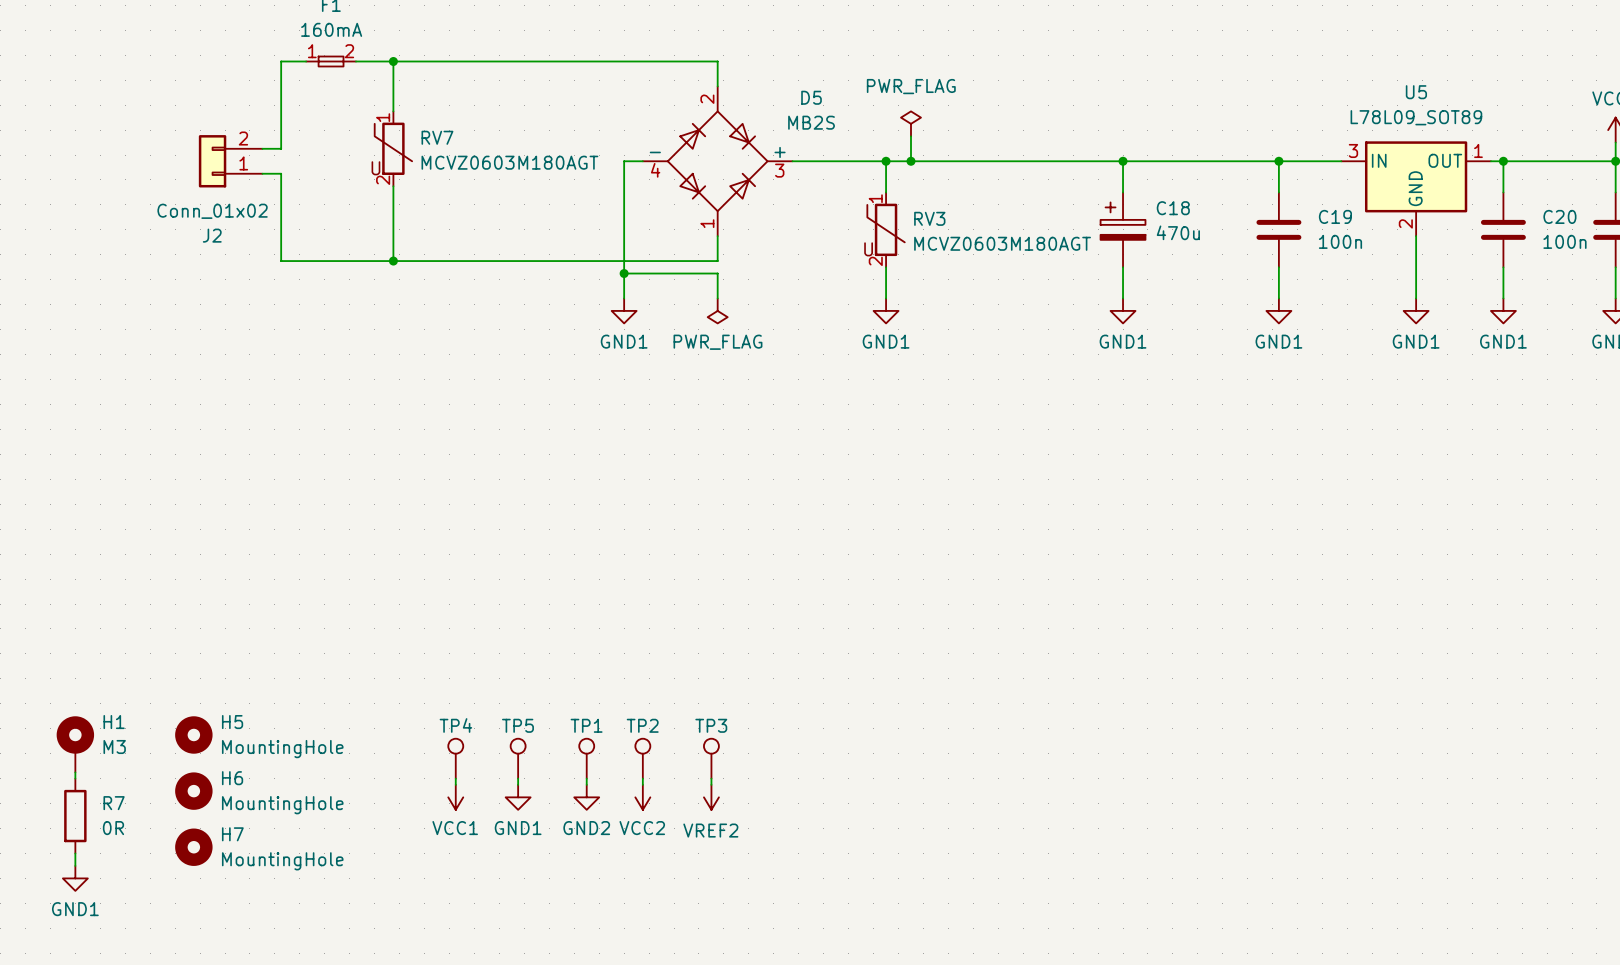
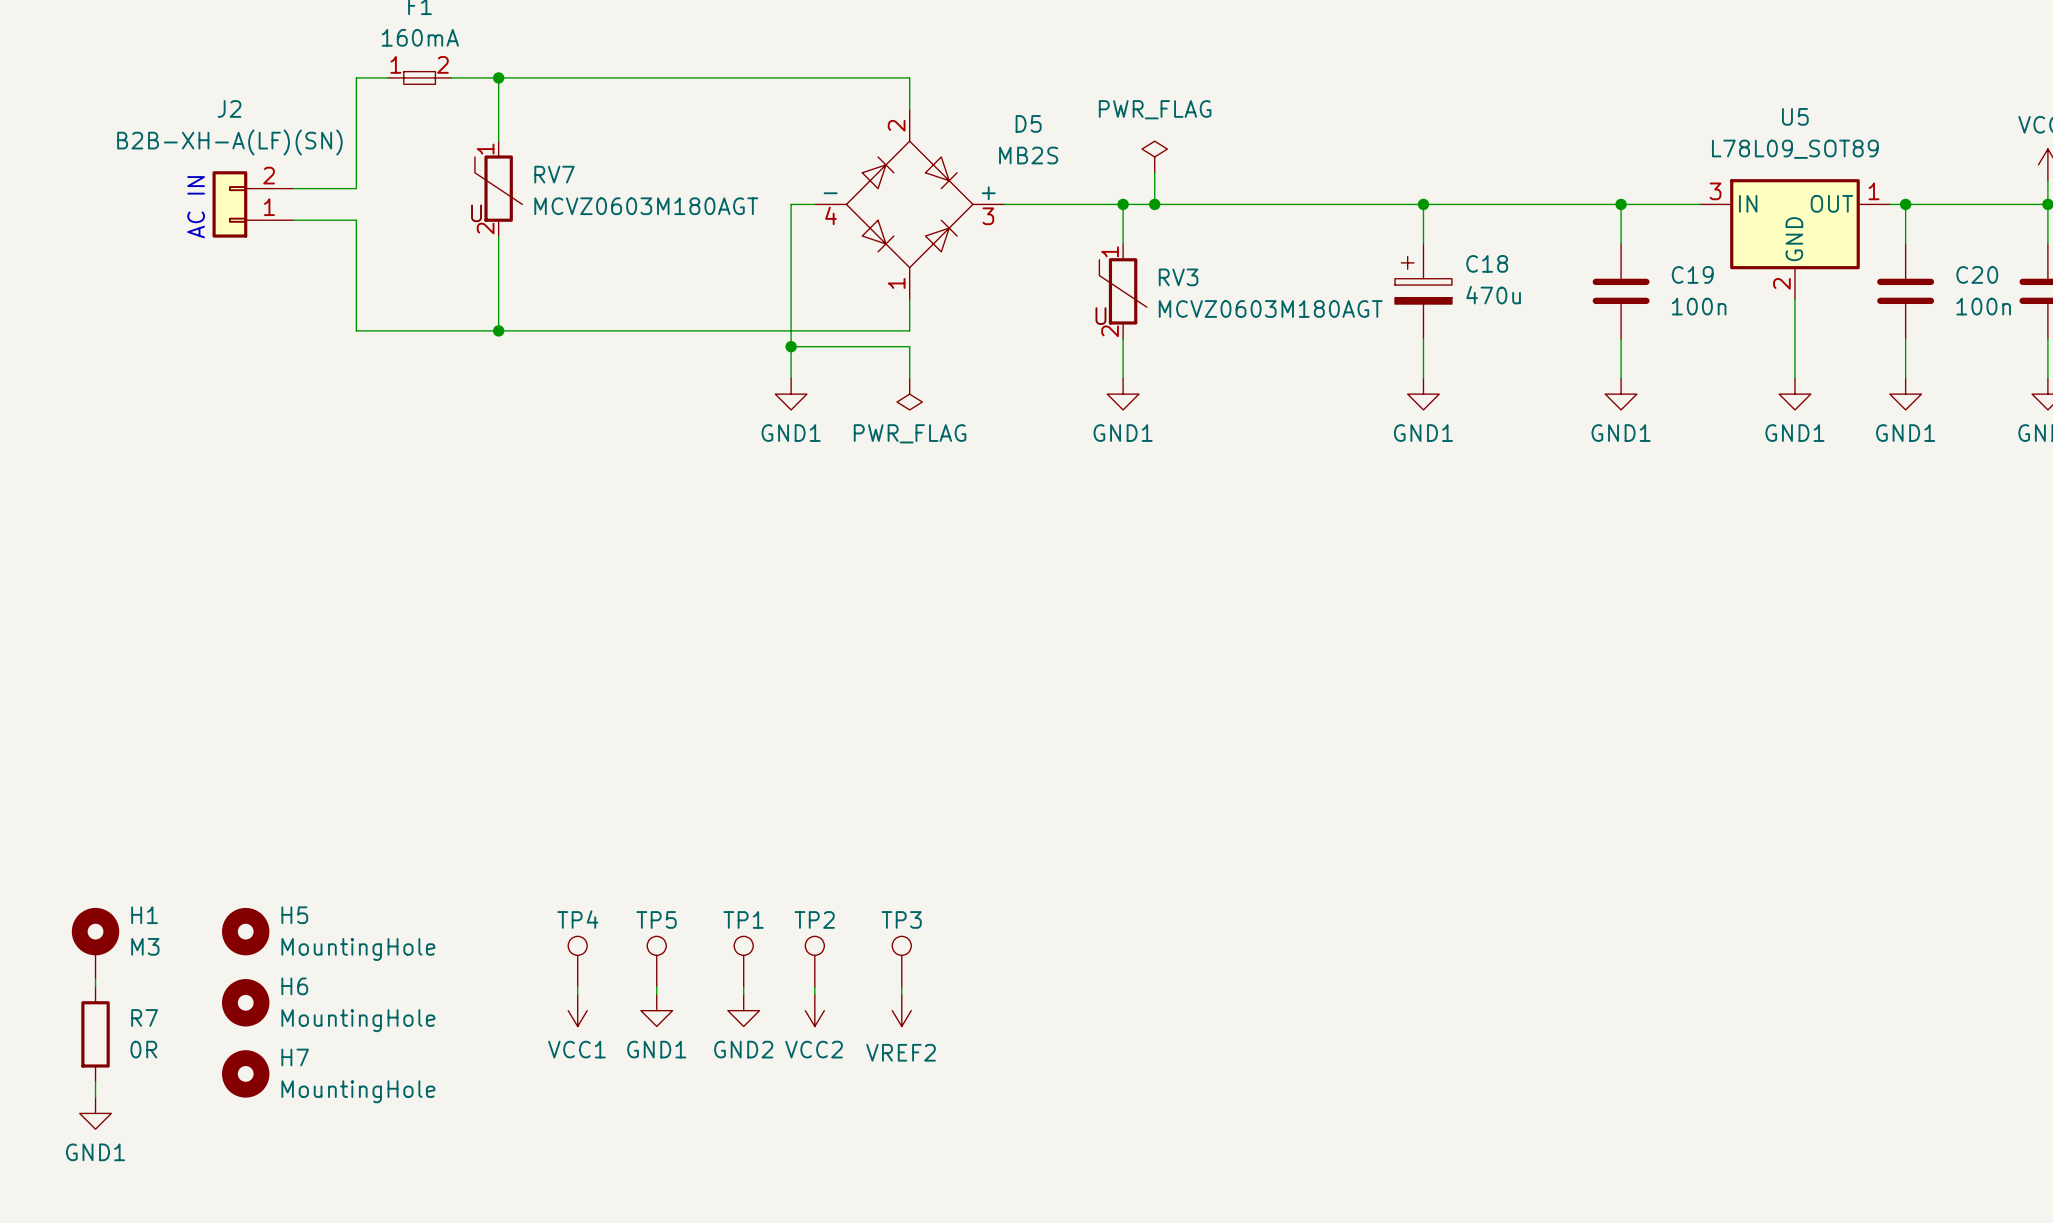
J2 text: none -> B2B-XH-A(LF)(SN) (229, 142)
J2 position: (230, 161) -> (252, 204)
text: none -> AC IN (196, 207)
J2 value: Conn_01x02 (212, 211) -> none
J2 name position: J2 (212, 235) -> J2 (229, 108)

